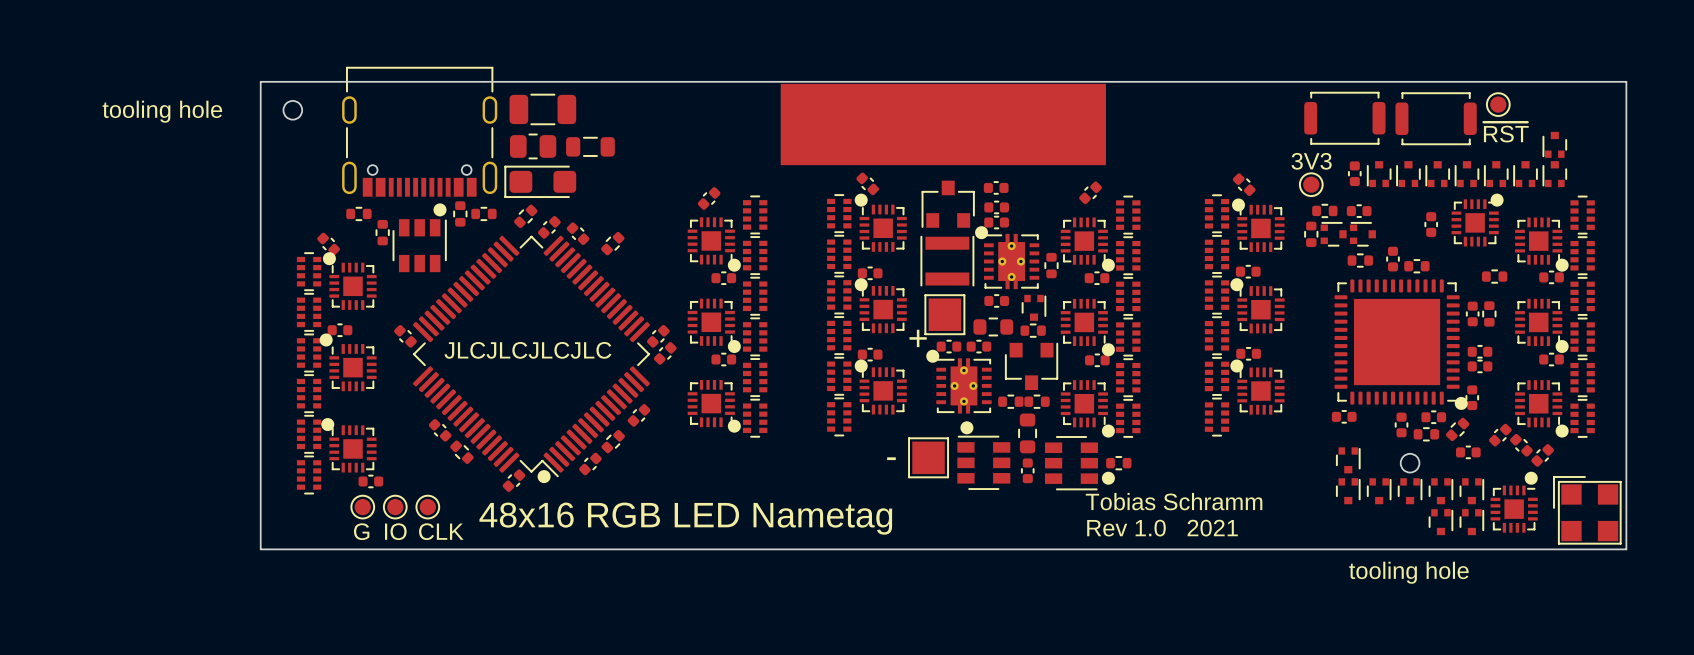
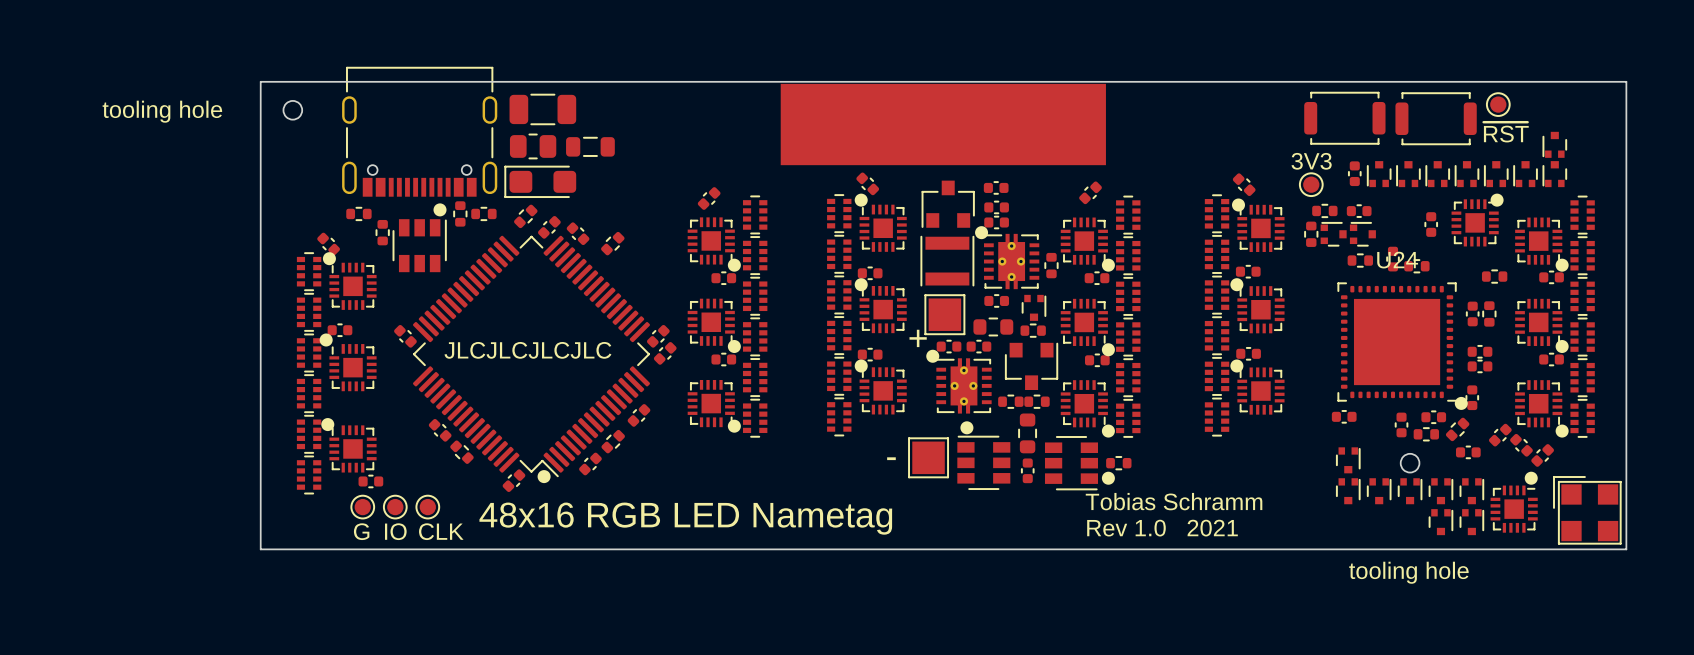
part: (1397, 342) -> none
U24: none -> (1397, 342)

